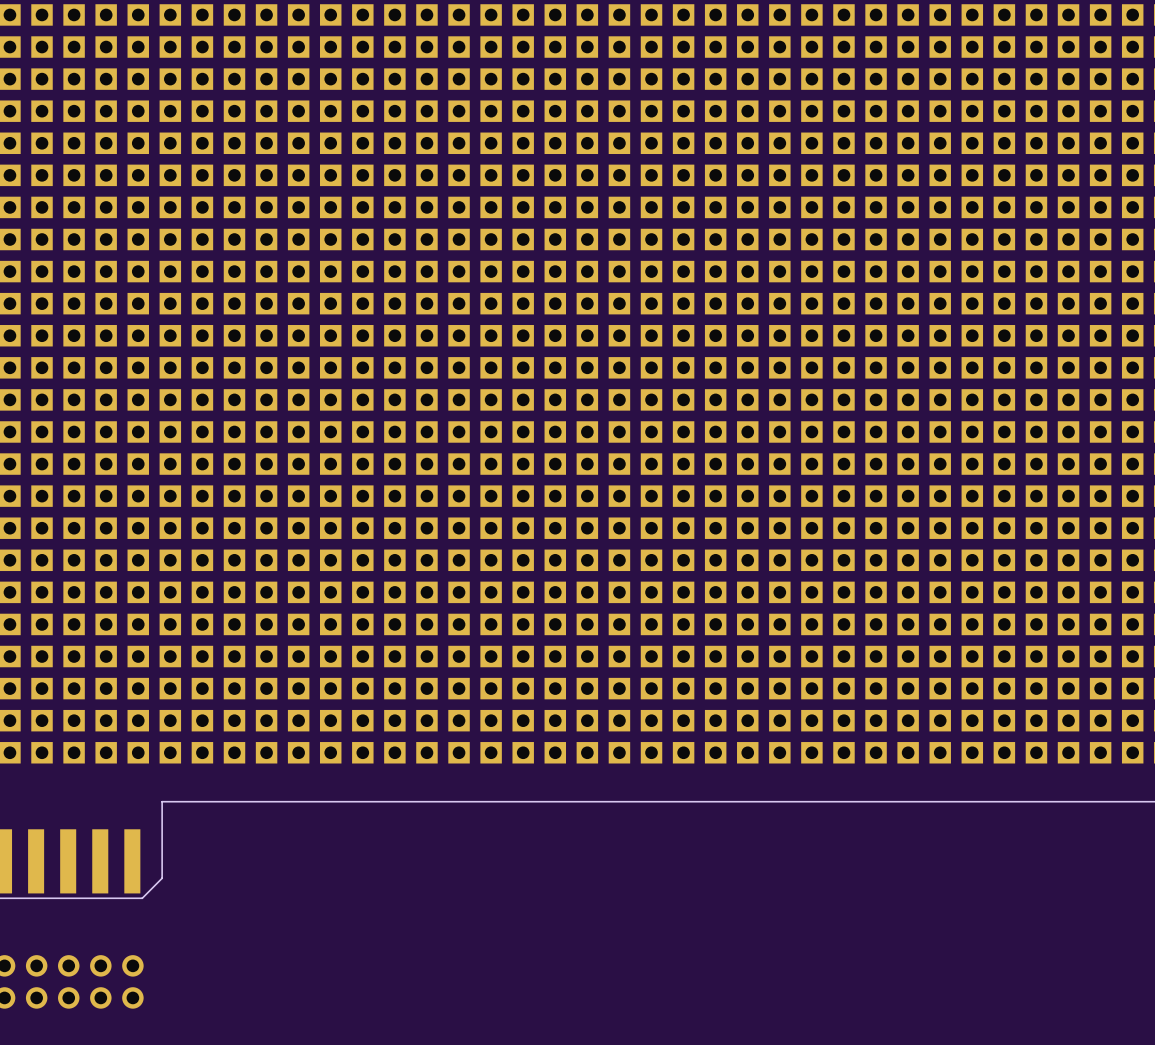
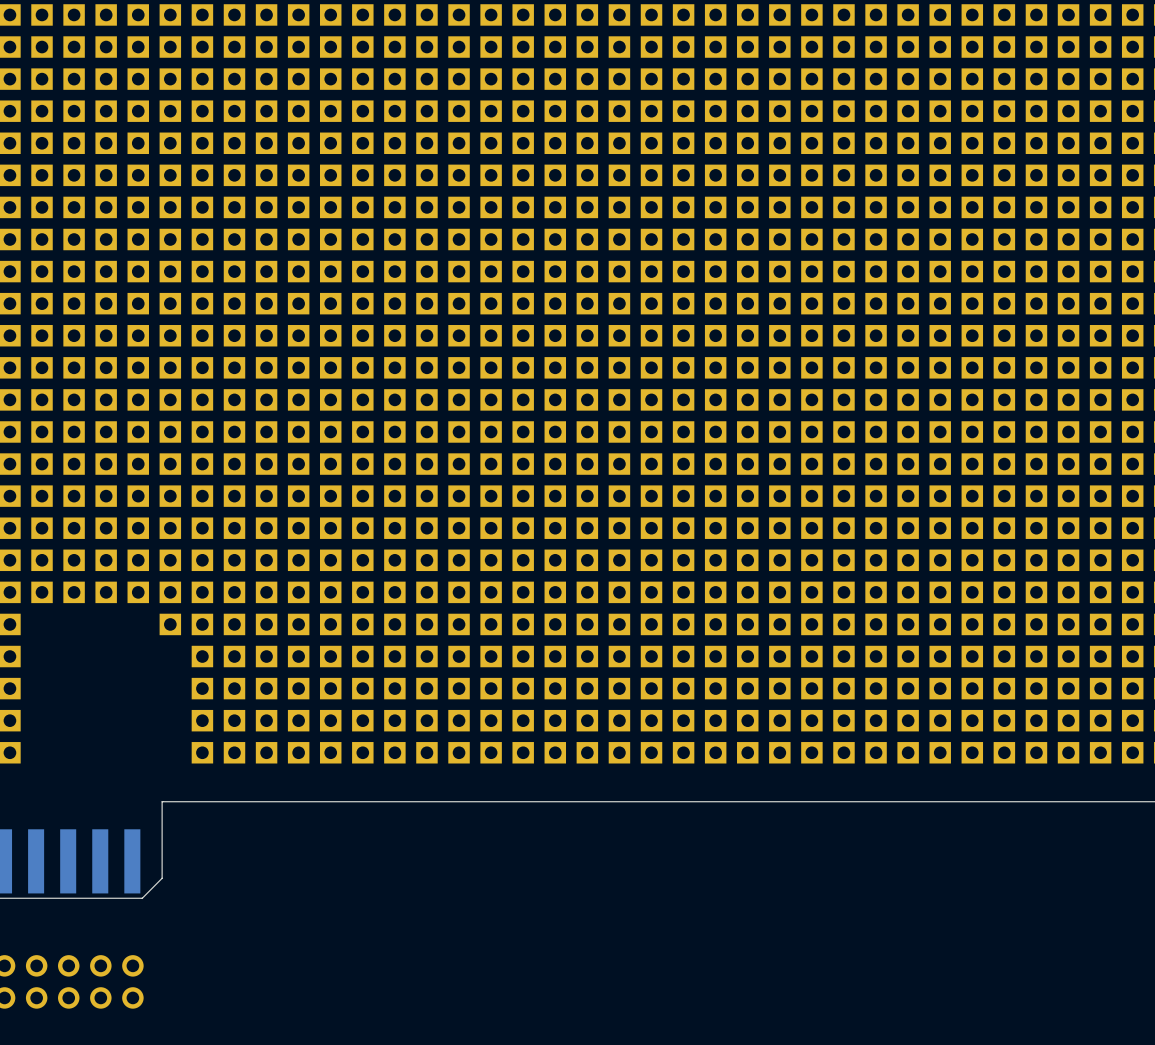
part: (42, 624) -> none
part: (74, 624) -> none
part: (106, 624) -> none
part: (138, 624) -> none
part: (42, 656) -> none
part: (74, 656) -> none
part: (106, 656) -> none
part: (138, 656) -> none
part: (170, 656) -> none
part: (42, 688) -> none
part: (74, 688) -> none
part: (106, 688) -> none
part: (138, 688) -> none
part: (170, 688) -> none
part: (42, 720) -> none
part: (74, 720) -> none
part: (106, 720) -> none
part: (138, 720) -> none
part: (170, 720) -> none
part: (42, 752) -> none
part: (74, 752) -> none
part: (106, 752) -> none
part: (138, 752) -> none
part: (170, 752) -> none

